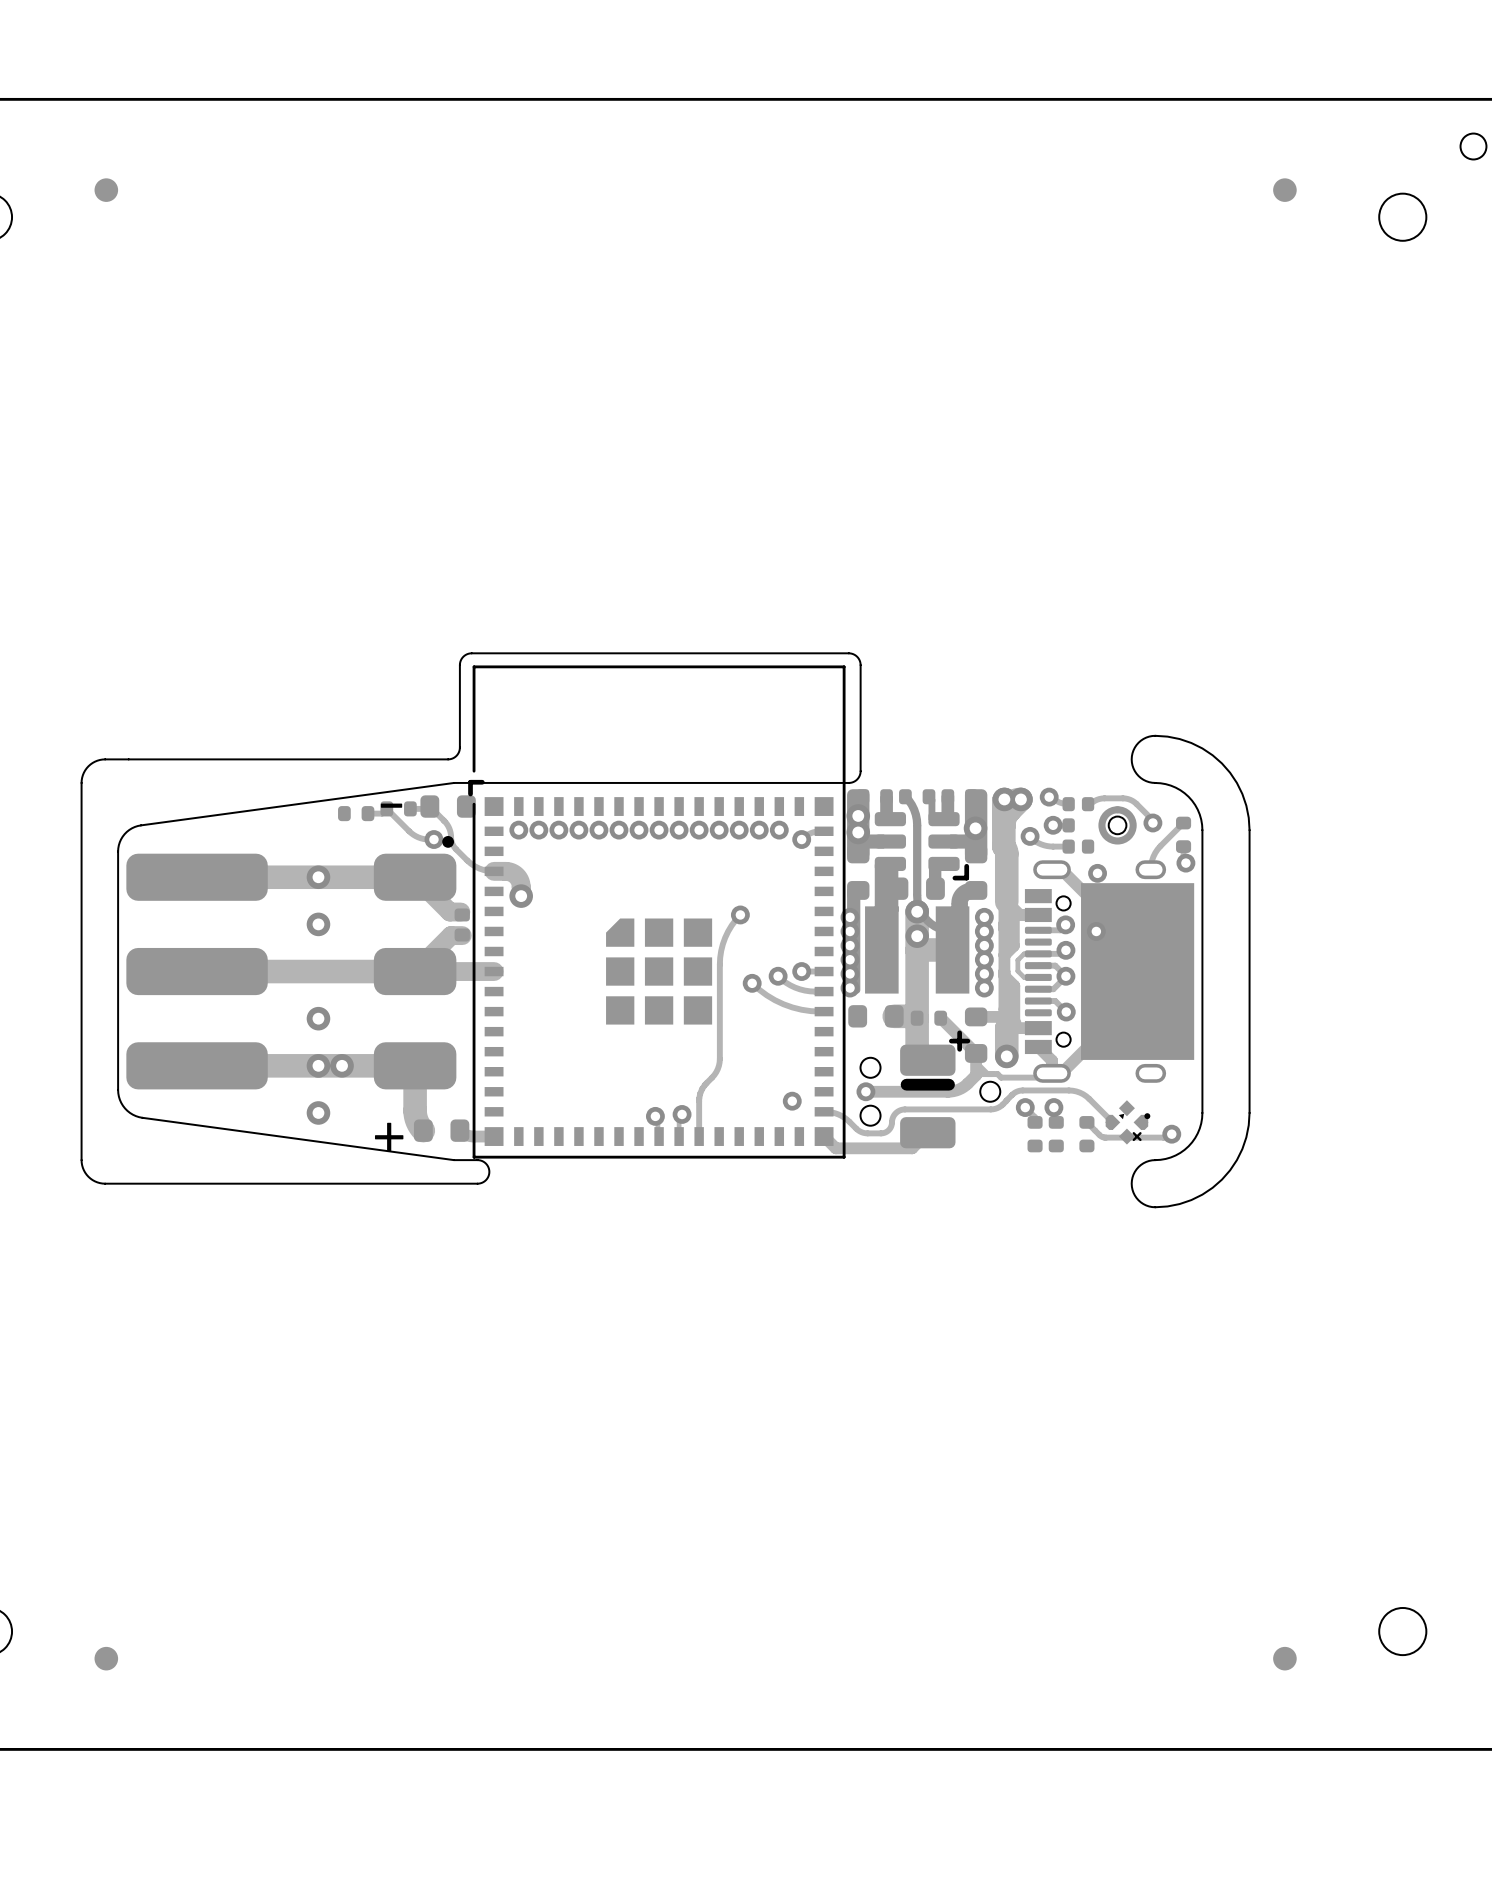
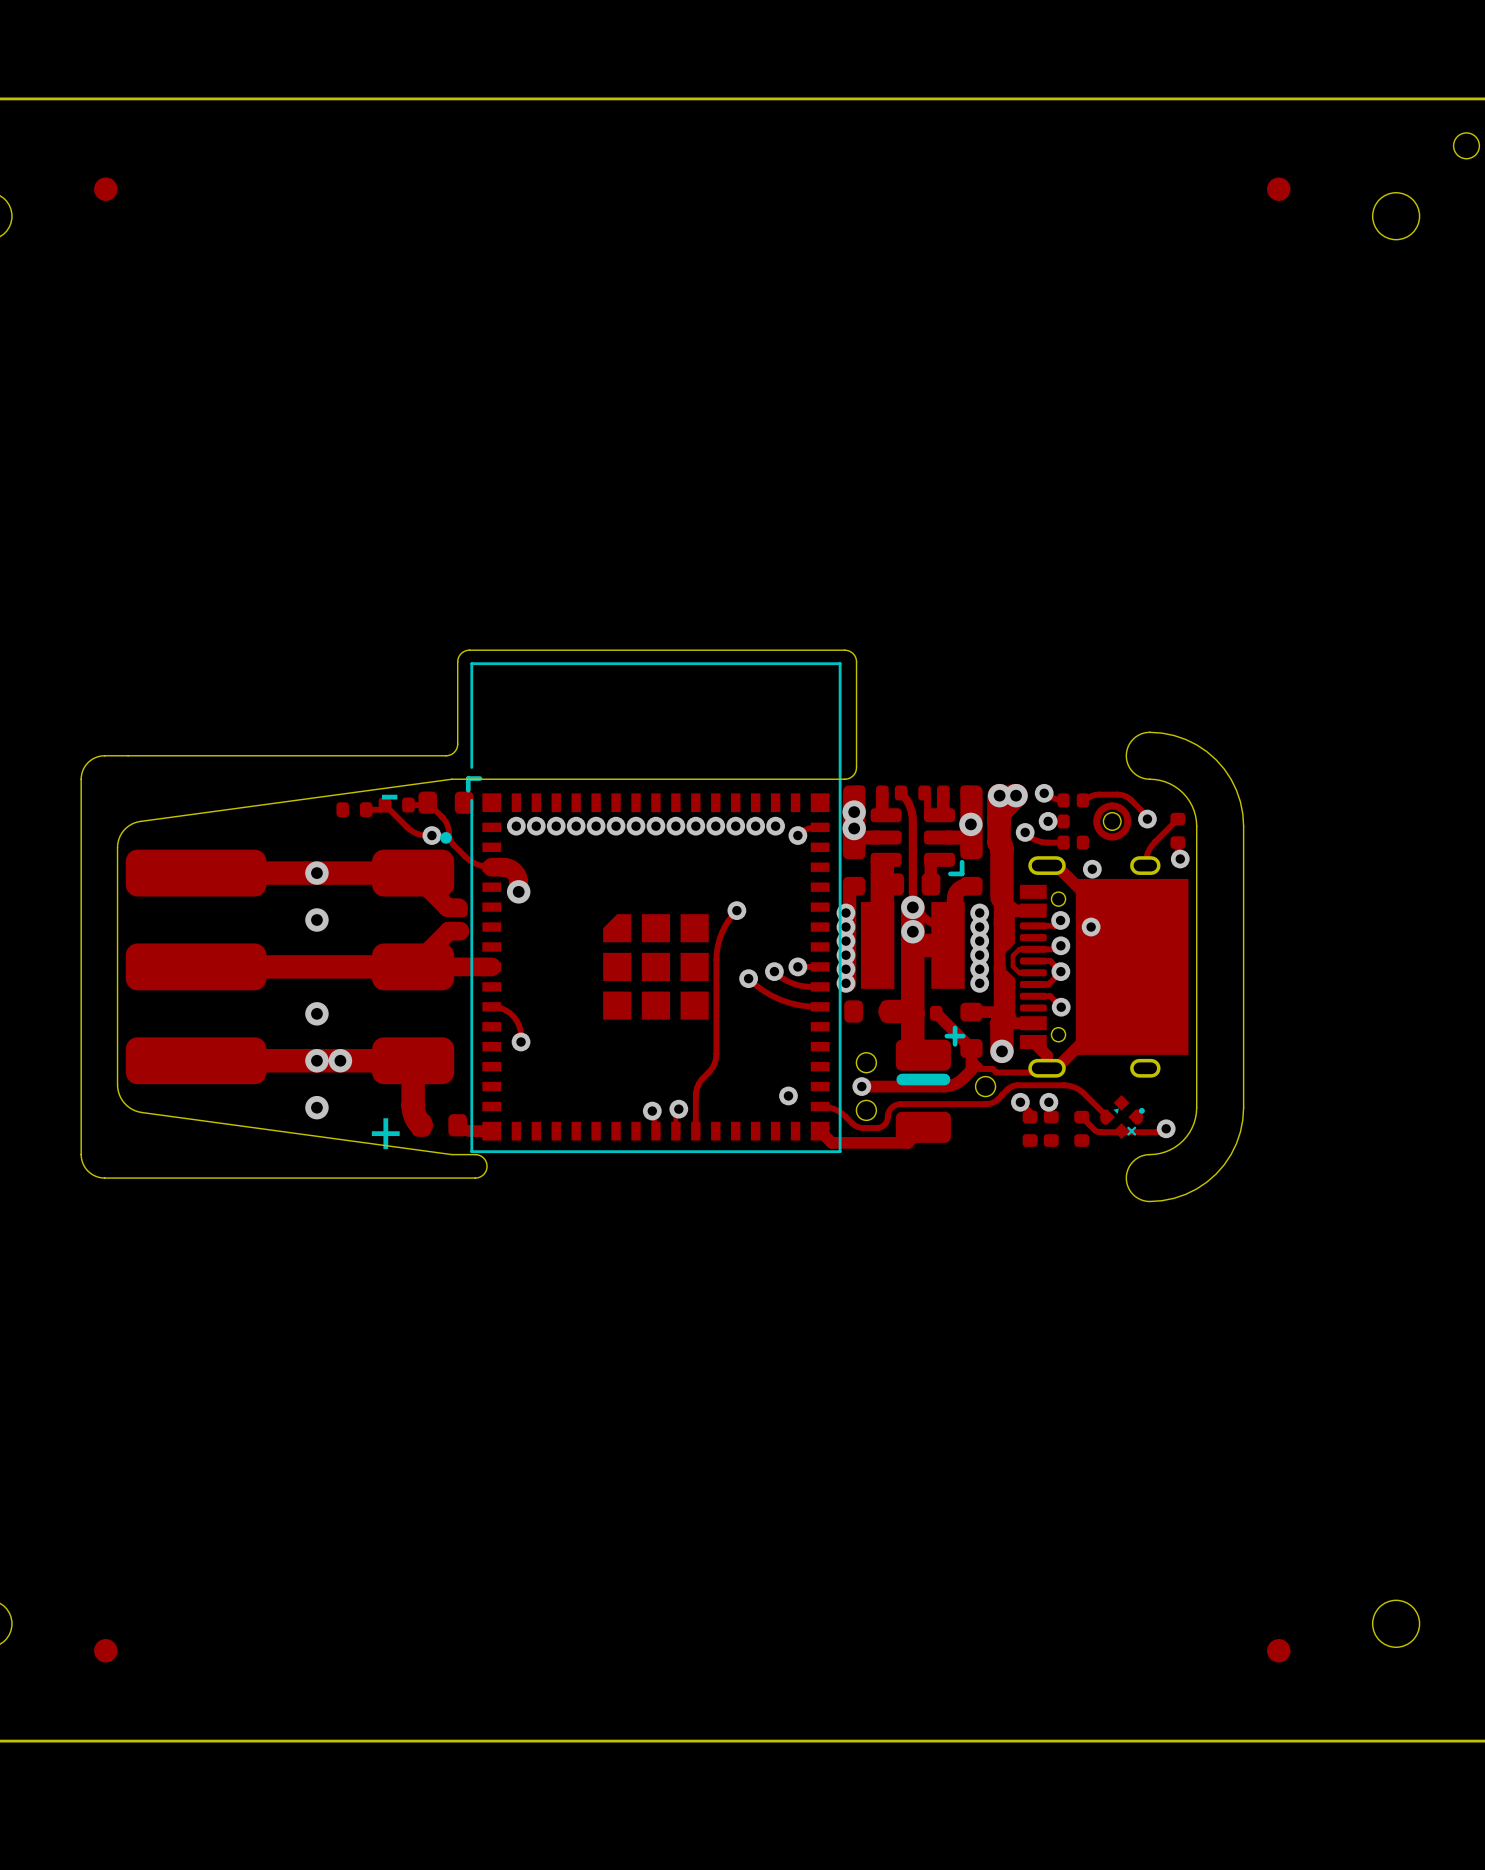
track: none -> (491, 1006) (502, 1009) (514, 1018) (520, 1028) (521, 1041)
via: none -> (521, 1041)

